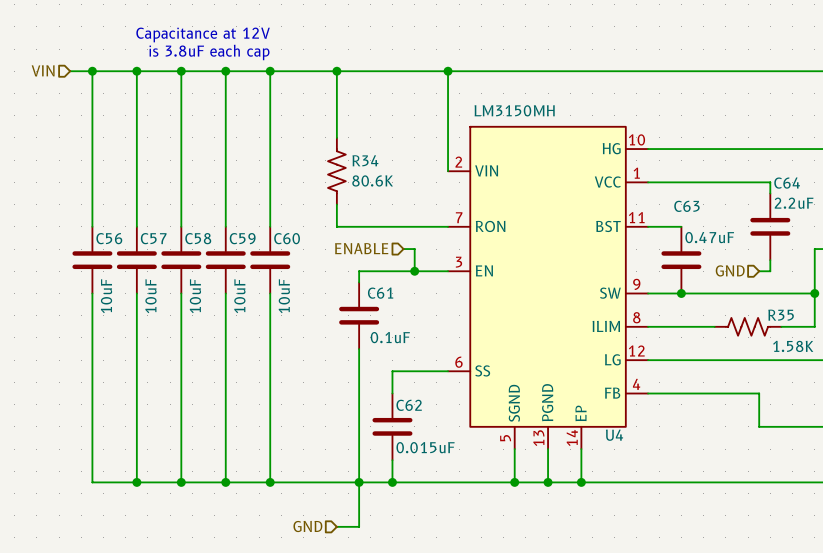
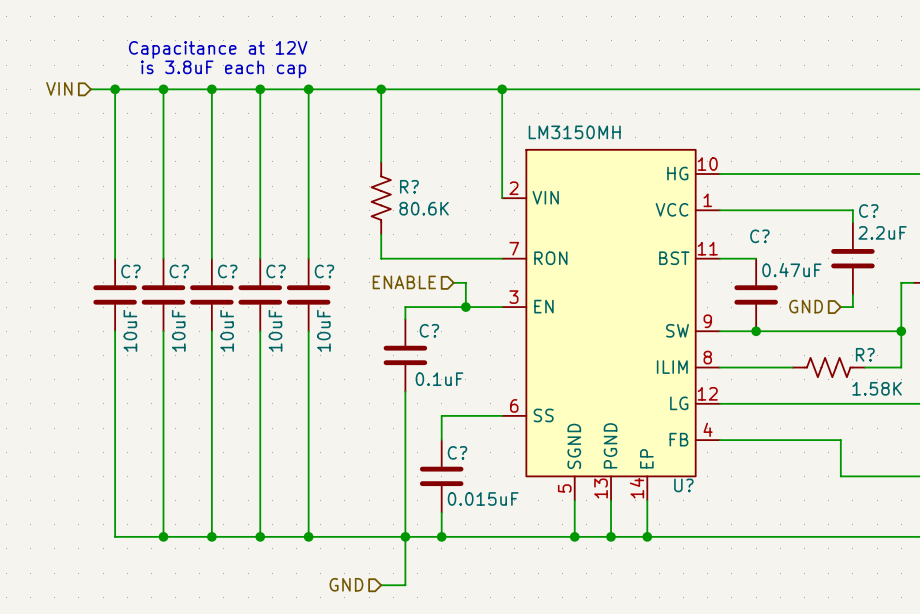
R34 name: R34 (365, 160) -> R? (409, 186)
C64 name: C64 (787, 183) -> C? (868, 210)
C63 name: C63 (686, 206) -> C? (759, 236)
C56 name: C56 (109, 238) -> C? (130, 271)
C57 name: C57 (153, 238) -> C? (179, 271)
C58 name: C58 (198, 238) -> C? (227, 271)
C59 name: C59 (242, 238) -> C? (276, 271)
C60 name: C60 (287, 238) -> C? (324, 271)
C61 name: C61 (380, 293) -> C? (429, 330)
R35 name: R35 (781, 315) -> R? (865, 354)
C62 name: C62 (409, 405) -> C? (457, 452)
U4 name: U4 (614, 435) -> U? (683, 485)

